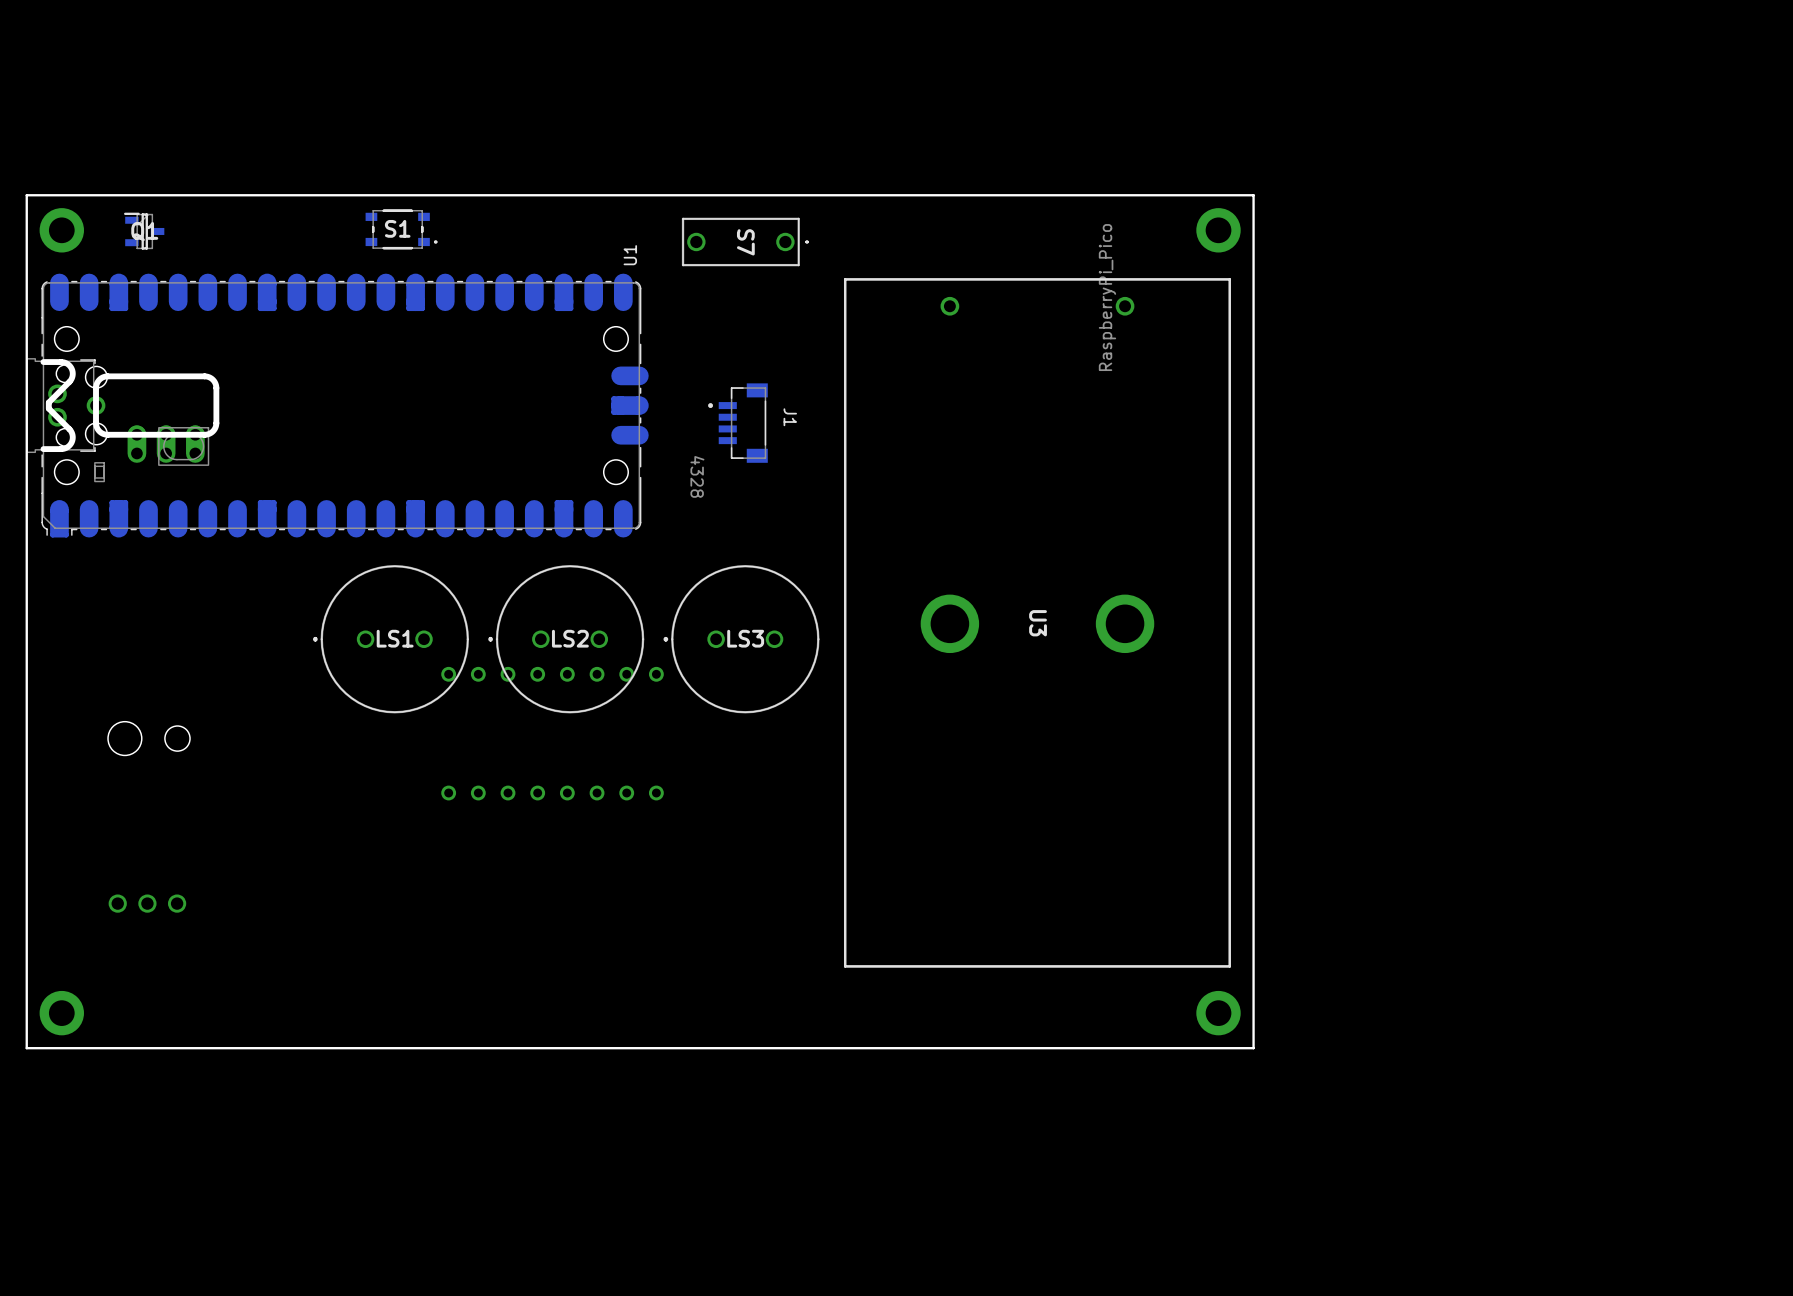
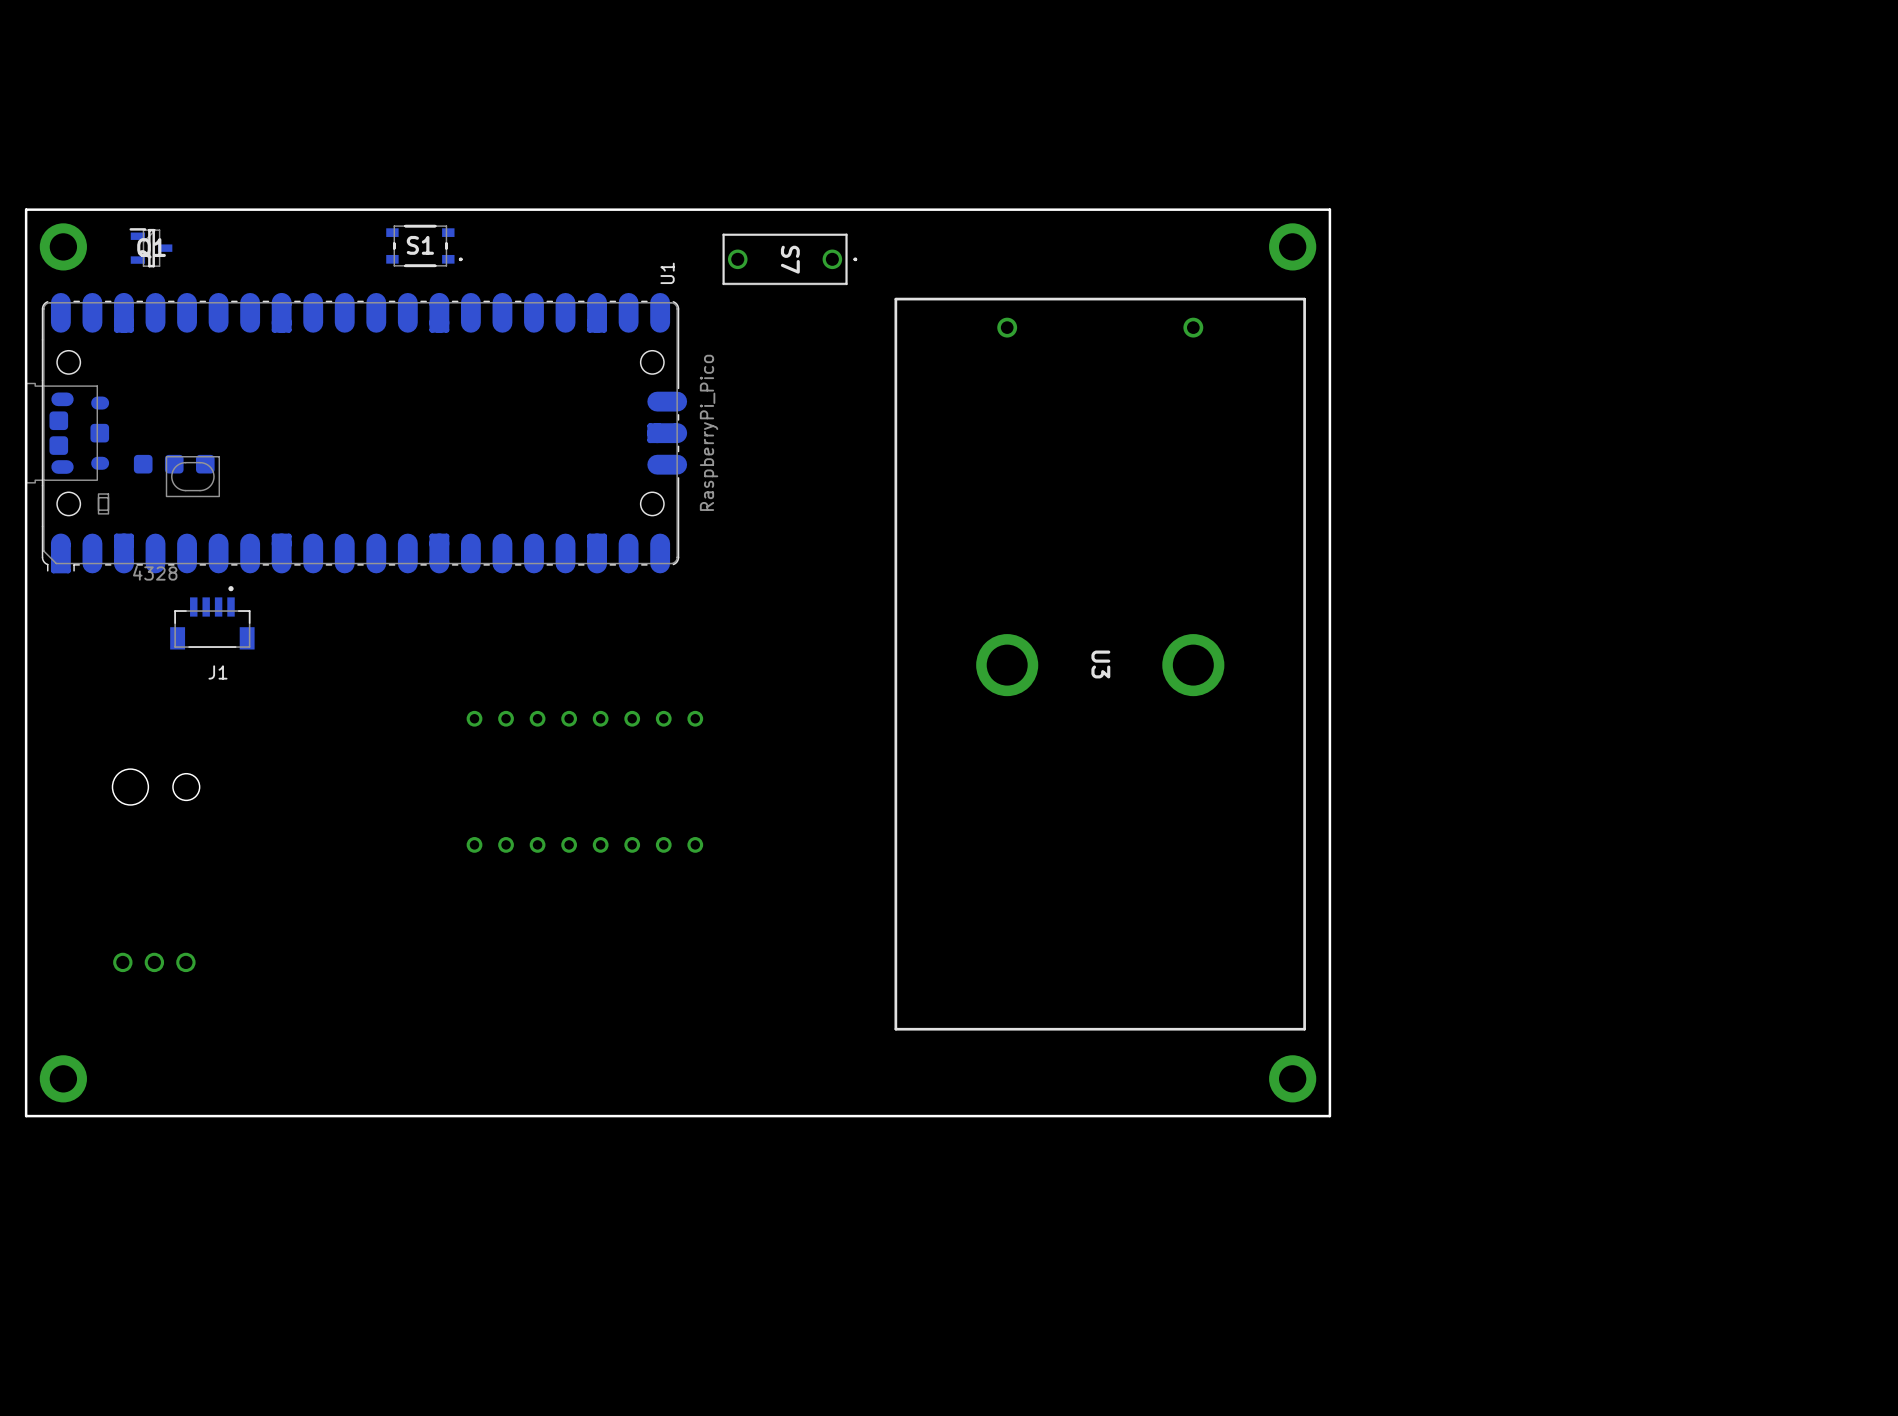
U1 footprint: [26, 273, 649, 538] -> [25, 292, 688, 574]
U1 value position: RaspberryPi_Pico (1107, 297) -> RaspberryPi_Pico (709, 432)
J1 rotation: 0° (738, 423) -> 90° clockwise (212, 617)
J1 position: (738, 423) -> (212, 617)
LS1: (391, 639) -> none
LS2: (566, 639) -> none
LS3: (741, 639) -> none

